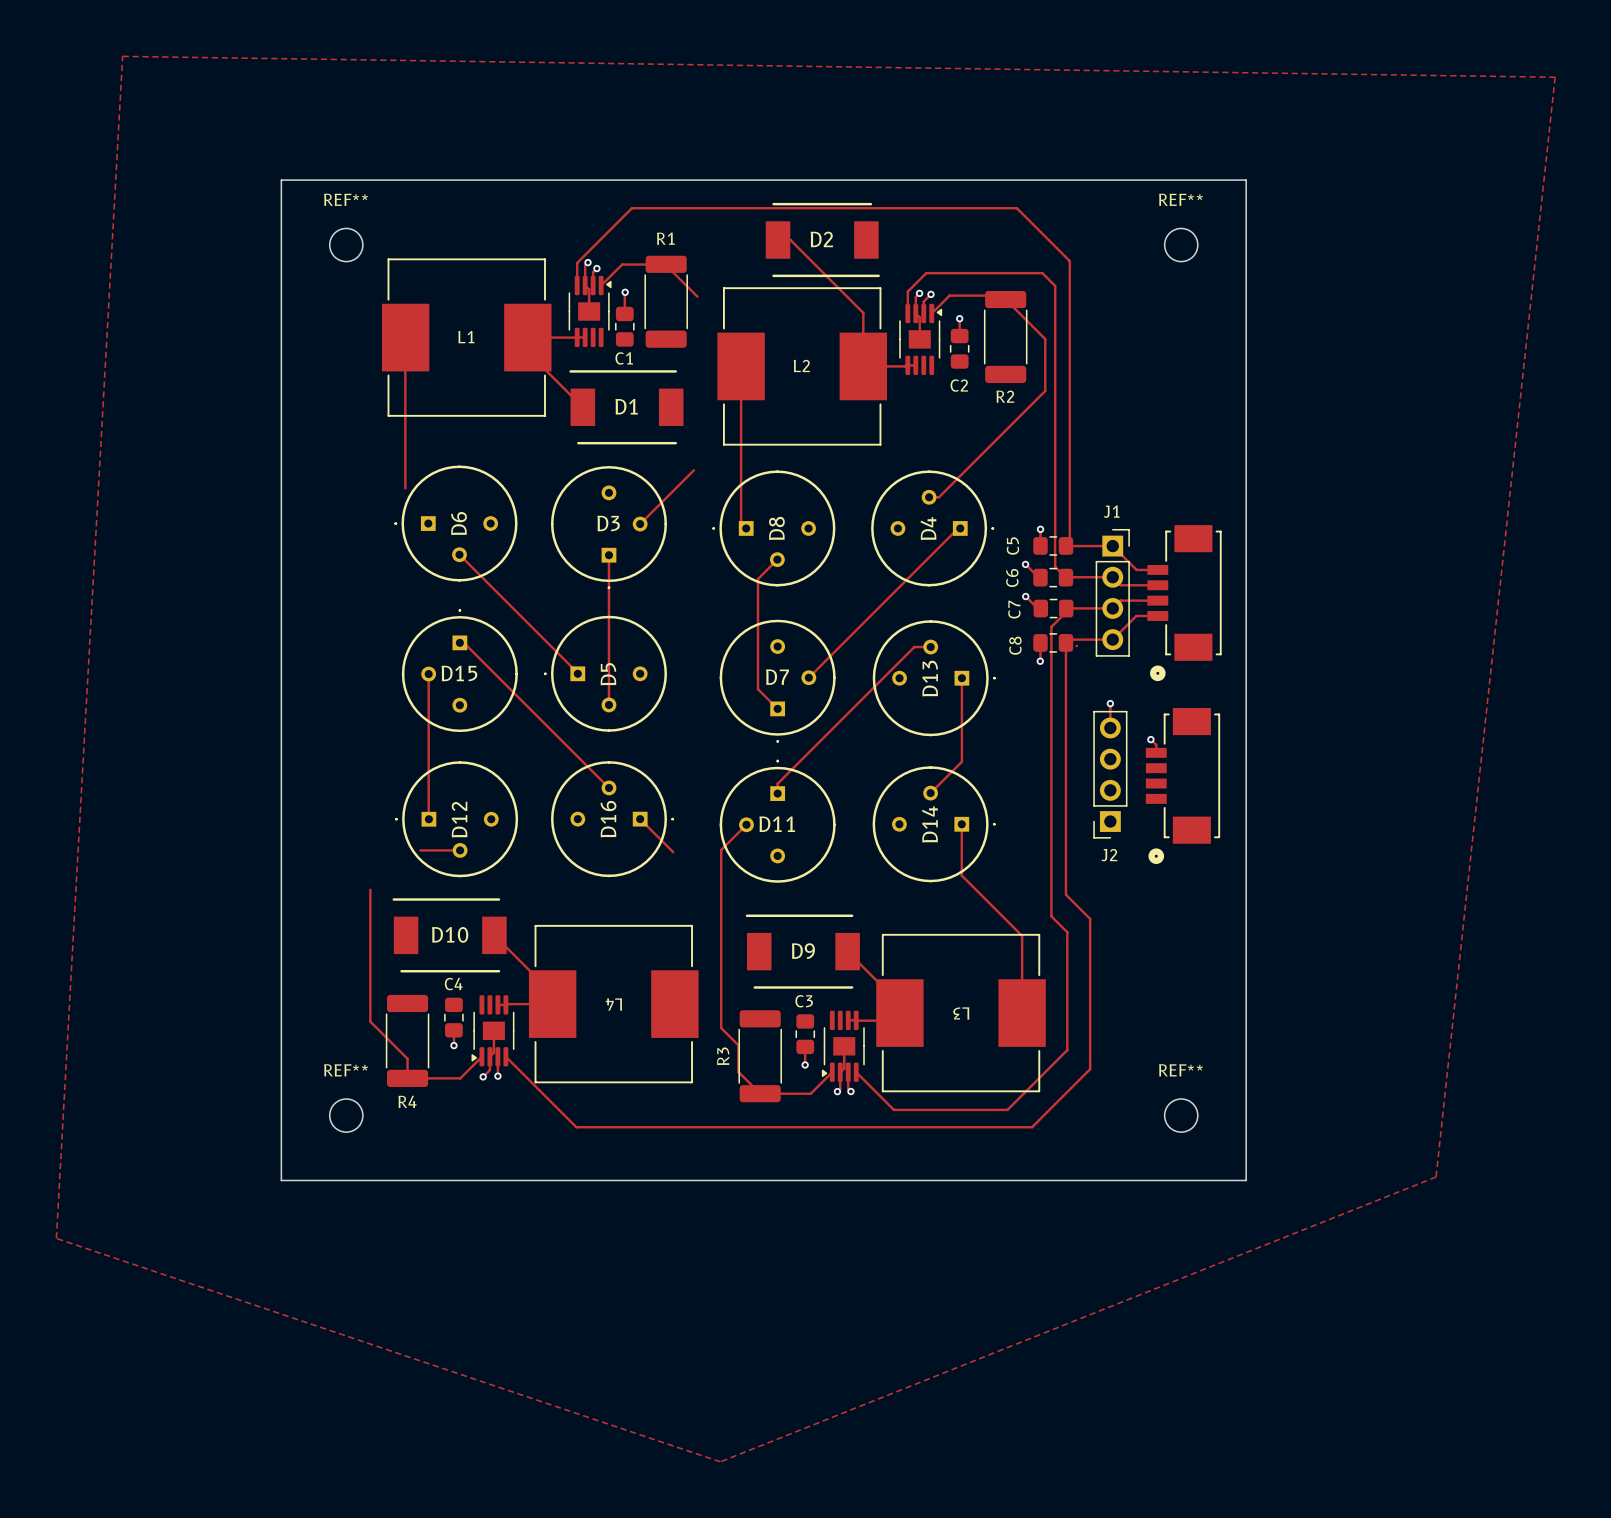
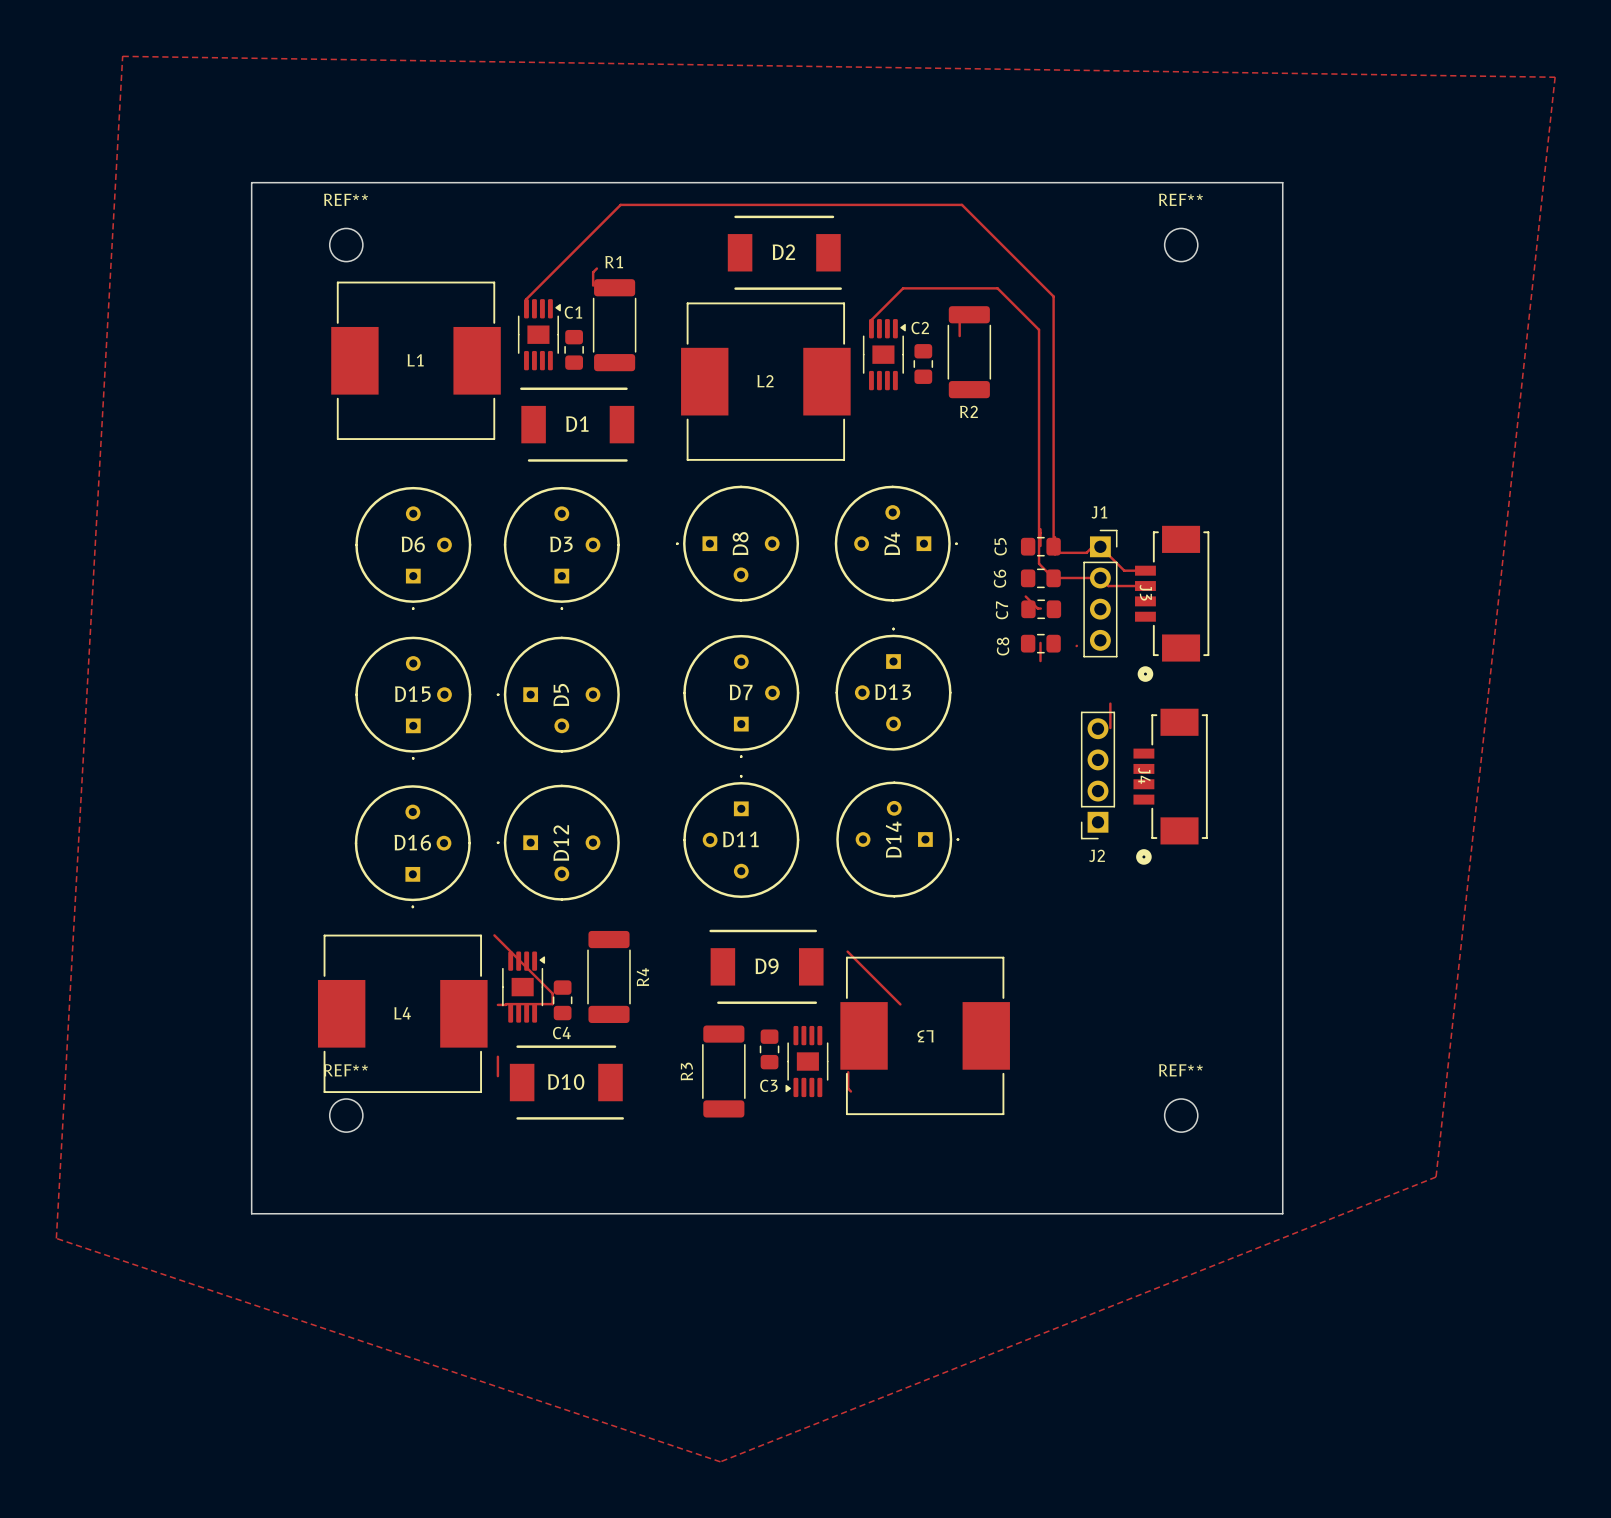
board edge: (281, 180) (1246, 180) (1246, 1180) (281, 1180) (281, 180) -> (251, 182) (251, 1213) (1282, 1213) (1282, 182) (251, 182)
track: (778, 240) (790, 240) (863, 312) (863, 366) (915, 365) -> none
D2 position: (822, 240) -> (784, 252)
track: (588, 262) (585, 265) (585, 285) (589, 289) (589, 311) -> none
via: (588, 262) -> none
via: (596, 268) -> none
track: (577, 285) (577, 262) (631, 208) (1016, 208) (1069, 261) (1069, 542) (1065, 545) (1072, 552) -> none
track: (601, 285) (622, 264) (665, 264) (697, 296) -> none
track: (625, 292) (624, 313) -> none
via: (625, 292) -> none
track: (919, 293) (915, 297) (915, 313) (919, 317) (919, 339) -> none
via: (919, 293) -> none
track: (930, 294) (923, 301) (923, 313) -> none
via: (930, 294) -> none
R1 position: (666, 301) -> (614, 325)
track: none -> (526, 308) (526, 299) (620, 204) (961, 204) (1053, 296) (1053, 546) (1059, 552) (1086, 552) (1092, 546) (1100, 546) (1124, 570) (1145, 570)
part position: (590, 311) -> (539, 334)
track: (907, 313) (907, 291) (926, 273) (1042, 273) (1055, 285) (1055, 537) -> none
track: (931, 313) (949, 295) (1001, 295) (1045, 339) (1045, 390) (938, 497) (929, 497) -> none
via: (959, 318) -> none
C1 position: (624, 326) -> (574, 349)
track: none -> (871, 328) (871, 320) (903, 288) (997, 288) (1039, 329) (1039, 563) (1053, 578) (1100, 577) (1108, 586) (1145, 586)
track: (405, 330) (405, 488) -> none
R2 position: (1005, 336) -> (969, 352)
L1 position: (466, 337) -> (416, 360)
track: (577, 337) (585, 337) -> none
track: (577, 337) (527, 337) (527, 352) (582, 407) -> none
part position: (920, 339) -> (884, 354)
C2 position: (959, 348) -> (923, 364)
C1 name position: C1 (624, 358) -> C1 (573, 312)
track: (741, 366) (741, 523) (746, 528) -> none
L2 position: (802, 366) -> (765, 381)
C2 name position: C2 (959, 385) -> C2 (920, 328)
D1 position: (626, 407) -> (577, 424)
track: (693, 470) (640, 524) -> none
D6 rotation: 0° (456, 523) -> 90° counterclockwise (413, 548)
D3 position: (608, 527) -> (561, 548)
D8 position: (773, 528) -> (737, 543)
D4 position: (932, 528) -> (896, 543)
track: (960, 528) (958, 528) (808, 677) -> none
via: (1040, 529) -> none
C5 position: (1053, 545) -> (1040, 546)
track: (1066, 546) (1112, 546) (1136, 569) (1157, 569) -> none
track: (459, 554) (577, 673) -> none
track: (1055, 554) (1055, 566) (1065, 577) (1112, 577) (1120, 585) (1157, 585) -> none
track: (608, 555) (608, 704) -> none
track: (777, 559) (758, 579) (758, 689) (777, 708) -> none
track: (1025, 564) (1038, 577) -> none
via: (1025, 564) -> none
C6 position: (1053, 577) -> (1040, 578)
J1 position: (1112, 592) -> (1100, 593)
via: (1025, 596) -> none
track: (1157, 600) (1120, 600) (1112, 608) (1066, 608) -> none
J3: none -> (1172, 603)
part: (1184, 603) -> none
C7 position: (1053, 608) -> (1041, 609)
track: (1066, 608) (1066, 612) (1051, 626) (1051, 916) (1067, 932) (1067, 1050) (1007, 1109) (893, 1109) (856, 1072) -> none
track: (1157, 615) (1136, 615) (1112, 639) (1069, 639) (1065, 642) (1065, 894) (1090, 918) (1090, 1069) (1032, 1127) (576, 1127) (505, 1056) -> none
track: (459, 642) (463, 642) (609, 787) -> none
C8 position: (1053, 642) -> (1040, 643)
track: (930, 647) (914, 647) (777, 783) (777, 793) -> none
via: (1040, 661) -> none
D15 rotation: 0° (459, 670) -> 180° (413, 698)
D5 position: (605, 673) -> (558, 694)
track: (428, 674) (428, 819) -> none
D13 rotation: 0° (934, 678) -> 90° counterclockwise (893, 689)
track: (961, 678) (961, 761) (930, 793) -> none
D7 position: (777, 681) -> (741, 696)
via: (1110, 703) -> none
track: (1150, 739) (1156, 744) (1156, 752) -> none
via: (1150, 739) -> none
J2 position: (1110, 774) -> (1098, 775)
part: (1182, 785) -> none
J4: none -> (1170, 786)
D12 position: (456, 819) -> (558, 842)
D16 rotation: 0° (612, 819) -> 90° clockwise (412, 846)
D16 position: (612, 819) -> (412, 846)
track: (640, 819) (673, 852) -> none
D11 position: (777, 821) -> (741, 836)
track: (746, 824) (721, 850) (721, 1028) (738, 1045) (738, 1071) (760, 1093) (810, 1093) (832, 1072) -> none
D14 position: (934, 824) -> (897, 839)
track: (961, 824) (961, 875) (1022, 935) (1022, 1020) -> none
track: (420, 850) (460, 850) -> none
track: (370, 889) (370, 1021) (407, 1058) (407, 1078) (460, 1078) (481, 1056) -> none
D10 rotation: 0° (449, 935) -> 180° (566, 1082)
D10 position: (449, 935) -> (566, 1082)
D9 position: (802, 951) -> (766, 966)
C4 name position: C4 (453, 984) -> C4 (561, 1033)
C3 name position: C3 (804, 1001) -> C3 (768, 1085)
L4 position: (613, 1004) -> (402, 1013)
L4 name rotation: 0° (613, 1004) -> 180° (402, 1013)
track: (900, 1012) (892, 1020) (848, 1020) -> none
L3 position: (961, 1013) -> (925, 1035)
C4 position: (453, 1017) -> (562, 1000)
part rotation: 0° (492, 1030) -> 180° (523, 987)
part position: (492, 1030) -> (523, 987)
track: (493, 1030) (493, 1052) (489, 1056) (489, 1070) (483, 1076) -> none
C3 position: (805, 1034) -> (769, 1049)
R4 position: (407, 1040) -> (609, 976)
via: (453, 1045) -> none
part position: (843, 1046) -> (806, 1061)
track: (844, 1046) (844, 1068) (840, 1072) (840, 1088) (837, 1091) -> none
track: (805, 1047) (805, 1064) -> none
R3 position: (760, 1056) -> (723, 1071)
via: (805, 1064) -> none
via: (483, 1076) -> none
via: (497, 1076) -> none
via: (837, 1091) -> none
via: (850, 1091) -> none
R4 name rotation: 0° (407, 1101) -> 90° counterclockwise (642, 977)
R4 name position: R4 (407, 1101) -> R4 (642, 977)

